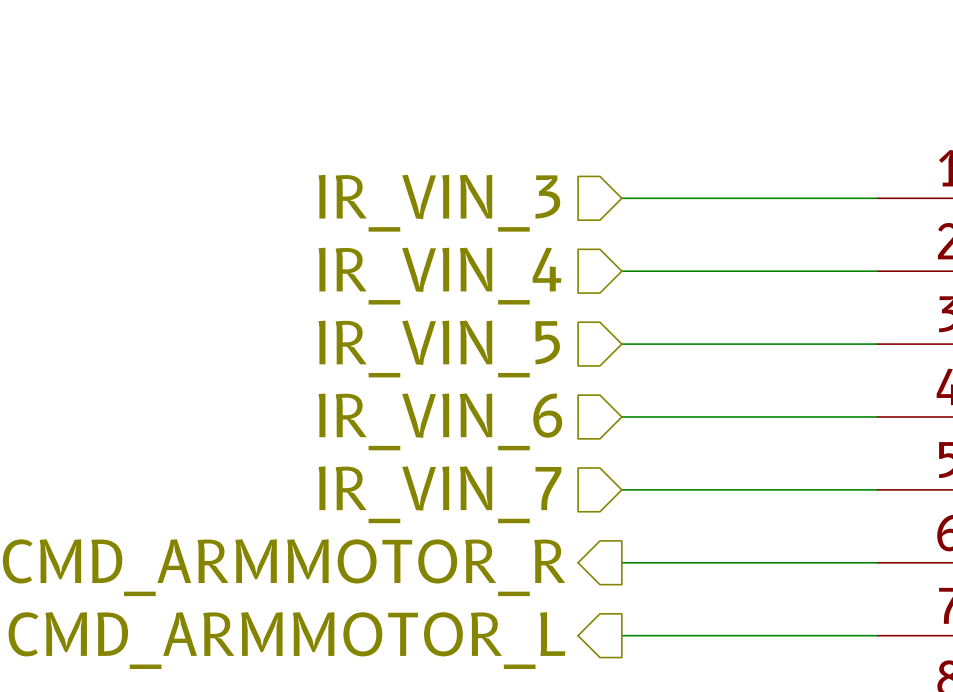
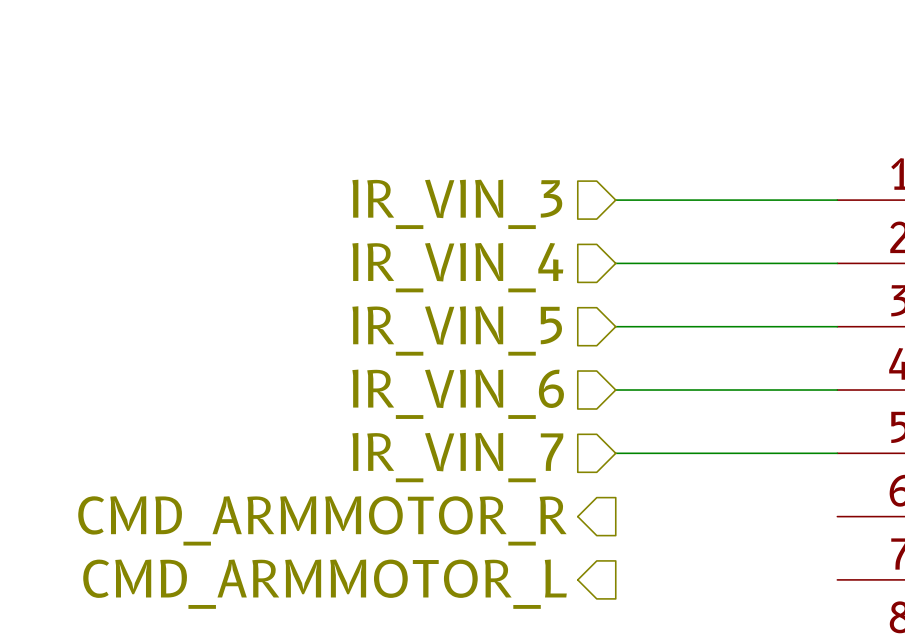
wire: (621, 562) (876, 562) -> none
wire: (621, 635) (876, 635) -> none

